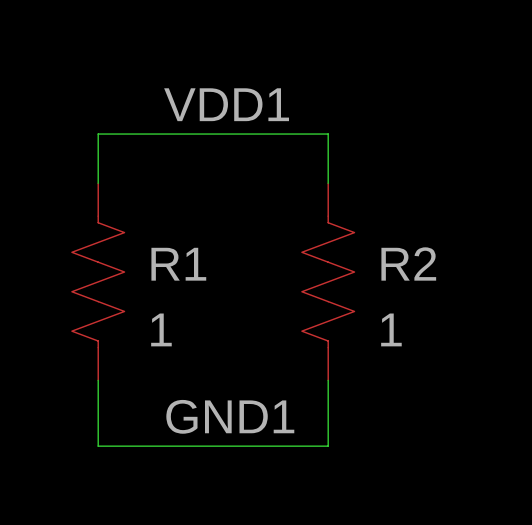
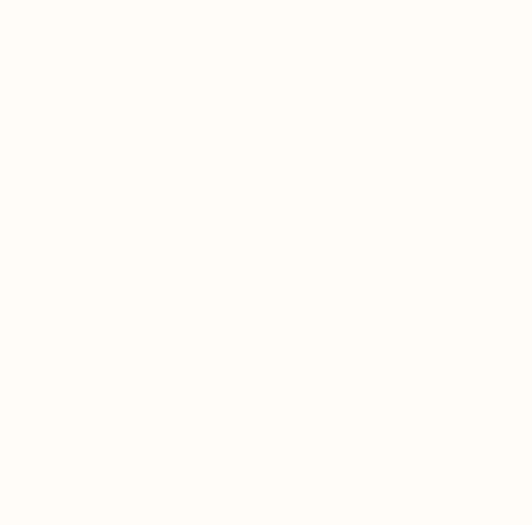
label: VDD1 (226, 104) -> none
wire: (98, 183) (98, 134) (328, 134) (328, 183) -> none
R1: 1 (98, 281) -> none
R2: 1 (328, 281) -> none
wire: (98, 380) (98, 446) (328, 446) (328, 380) -> none
label: GND1 (230, 416) -> none

